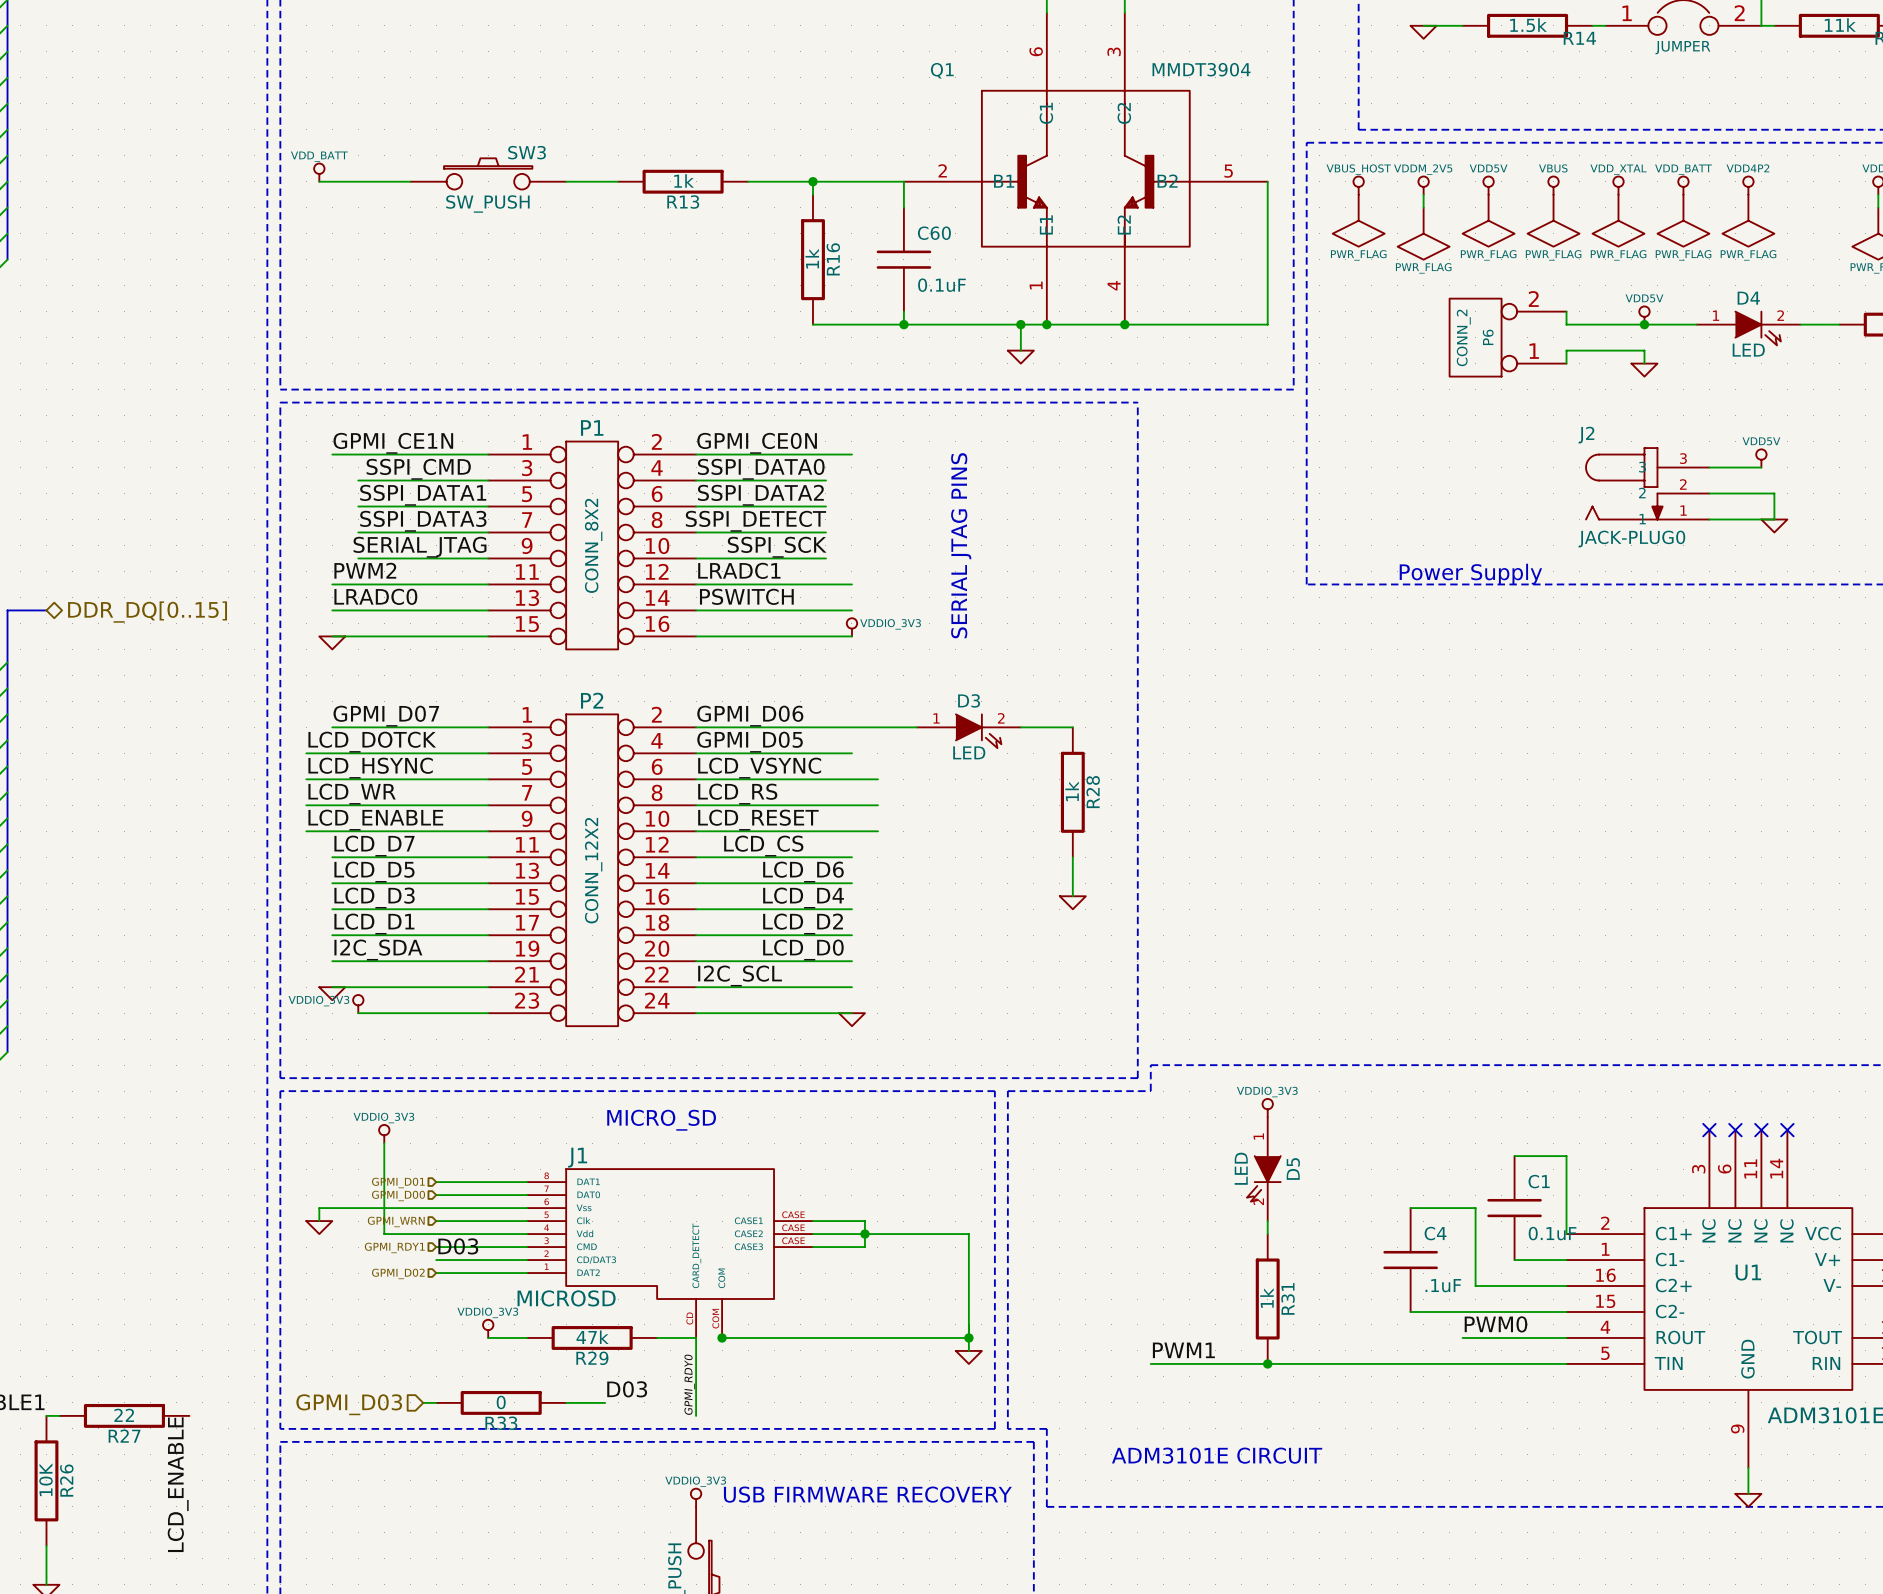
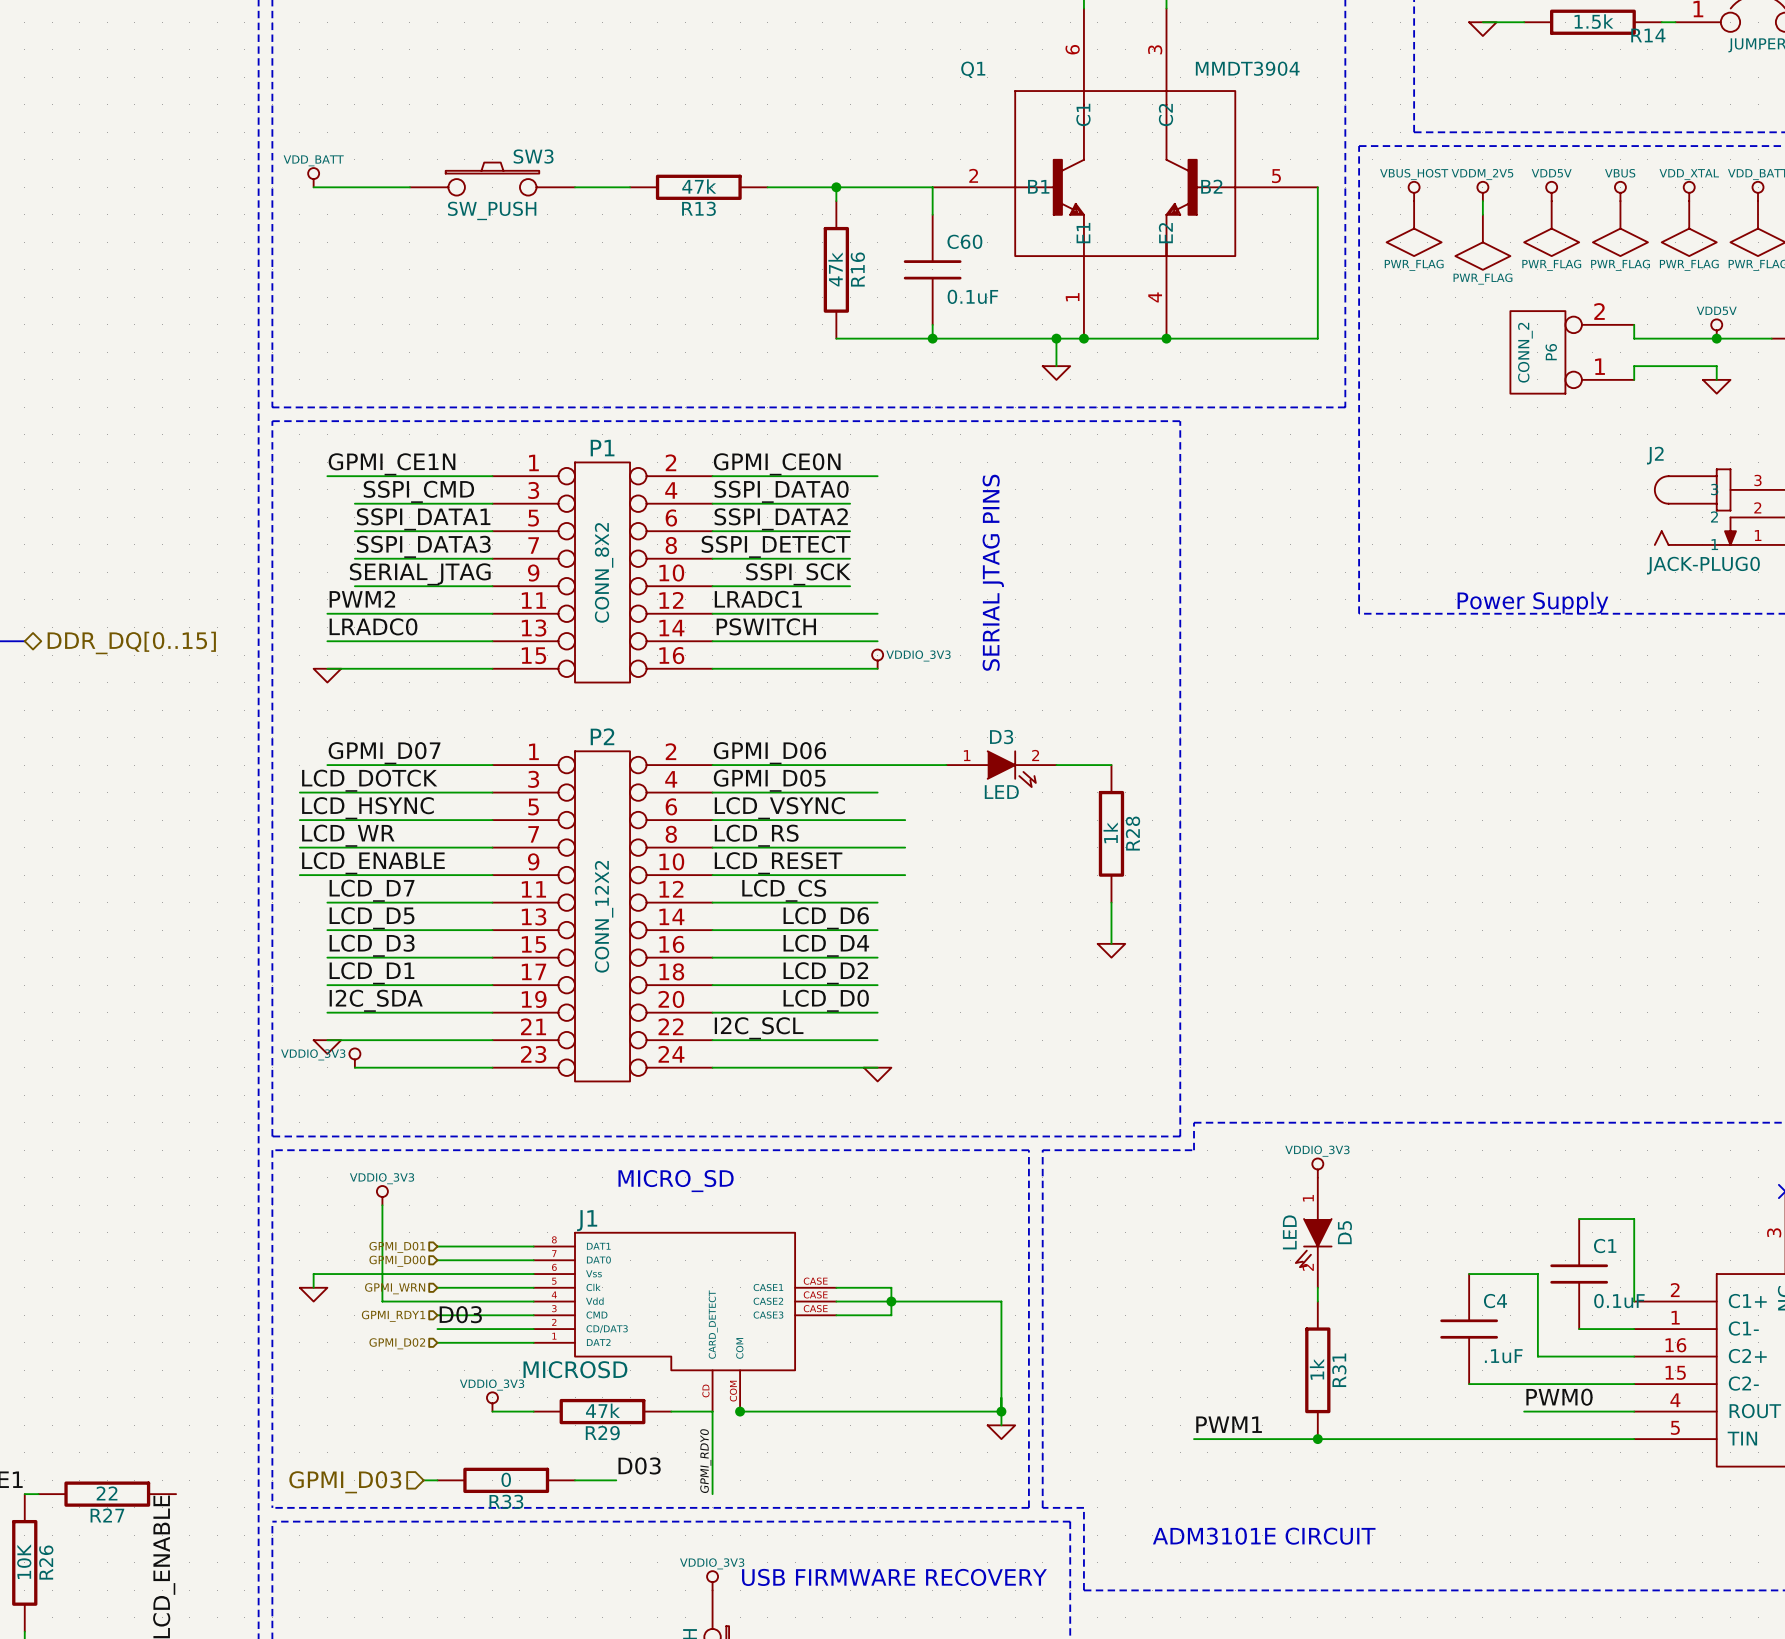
R13 value: 1k (684, 180) -> 47k (699, 186)
R16 value: 1k (812, 258) -> 47k (835, 269)

